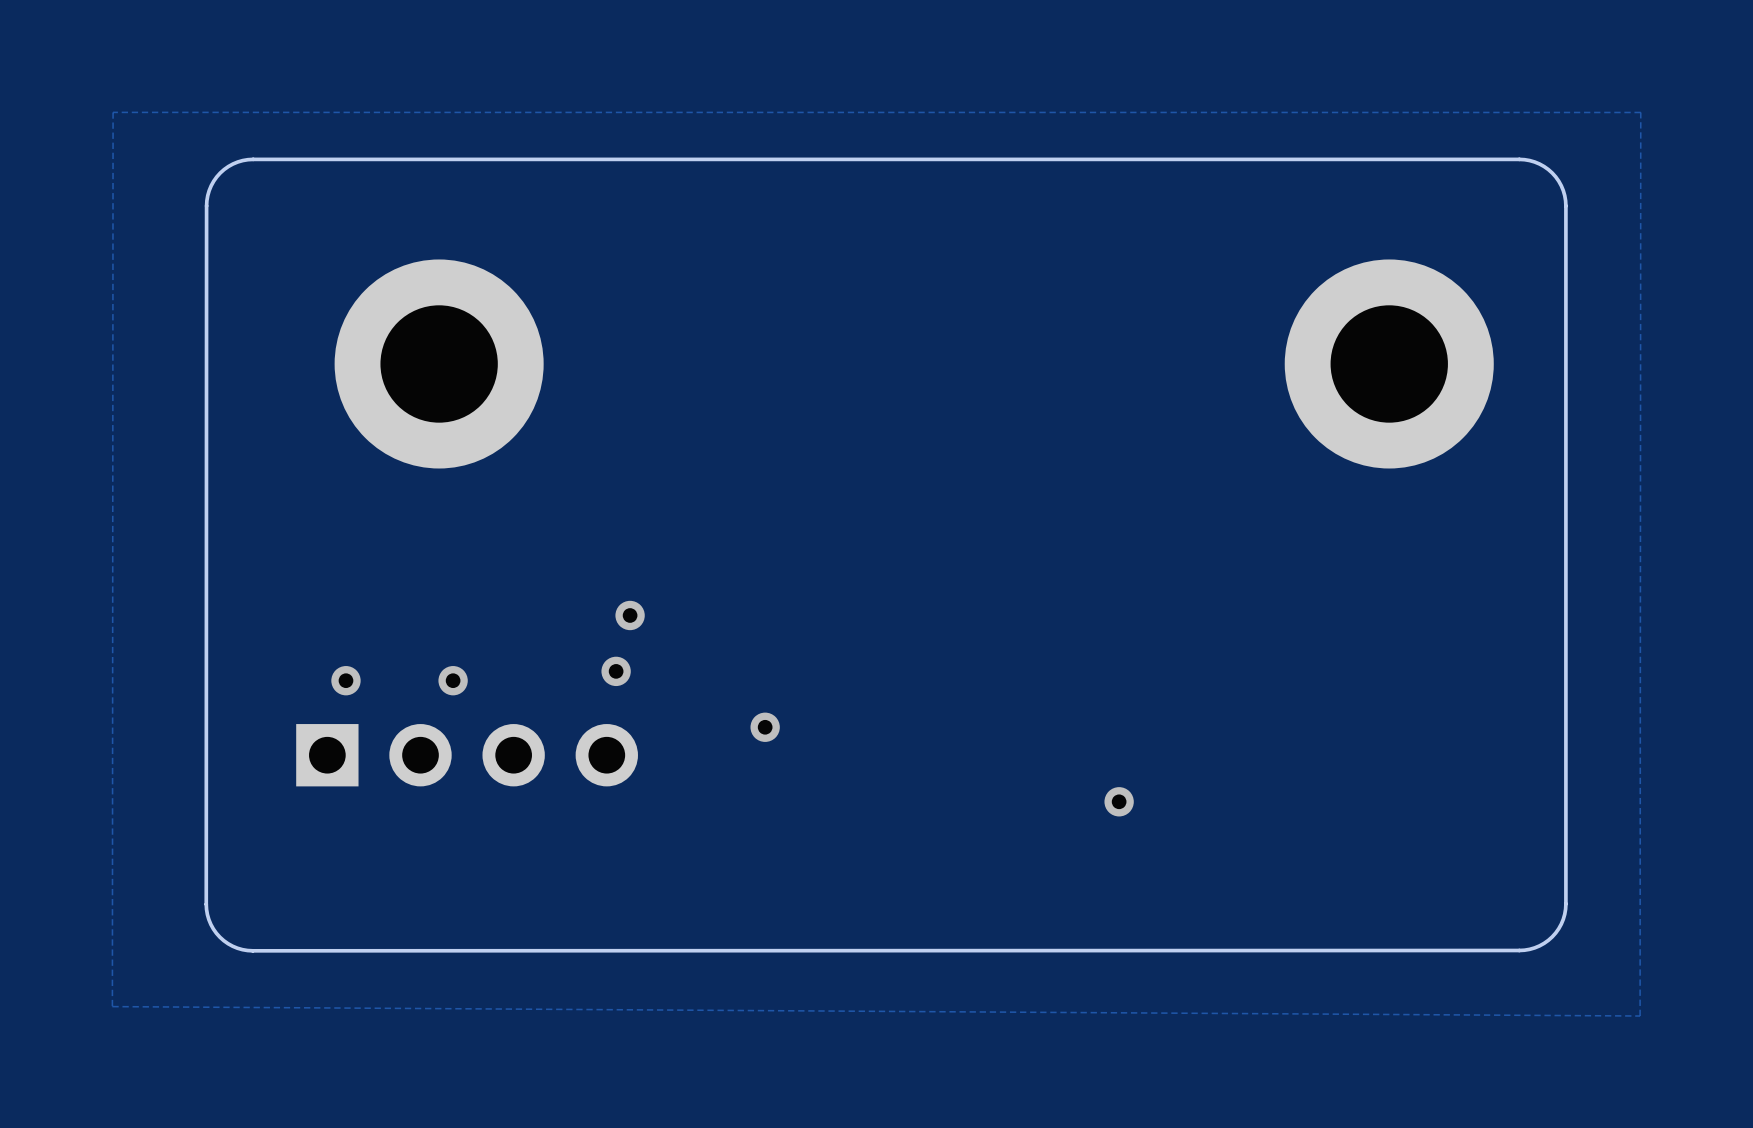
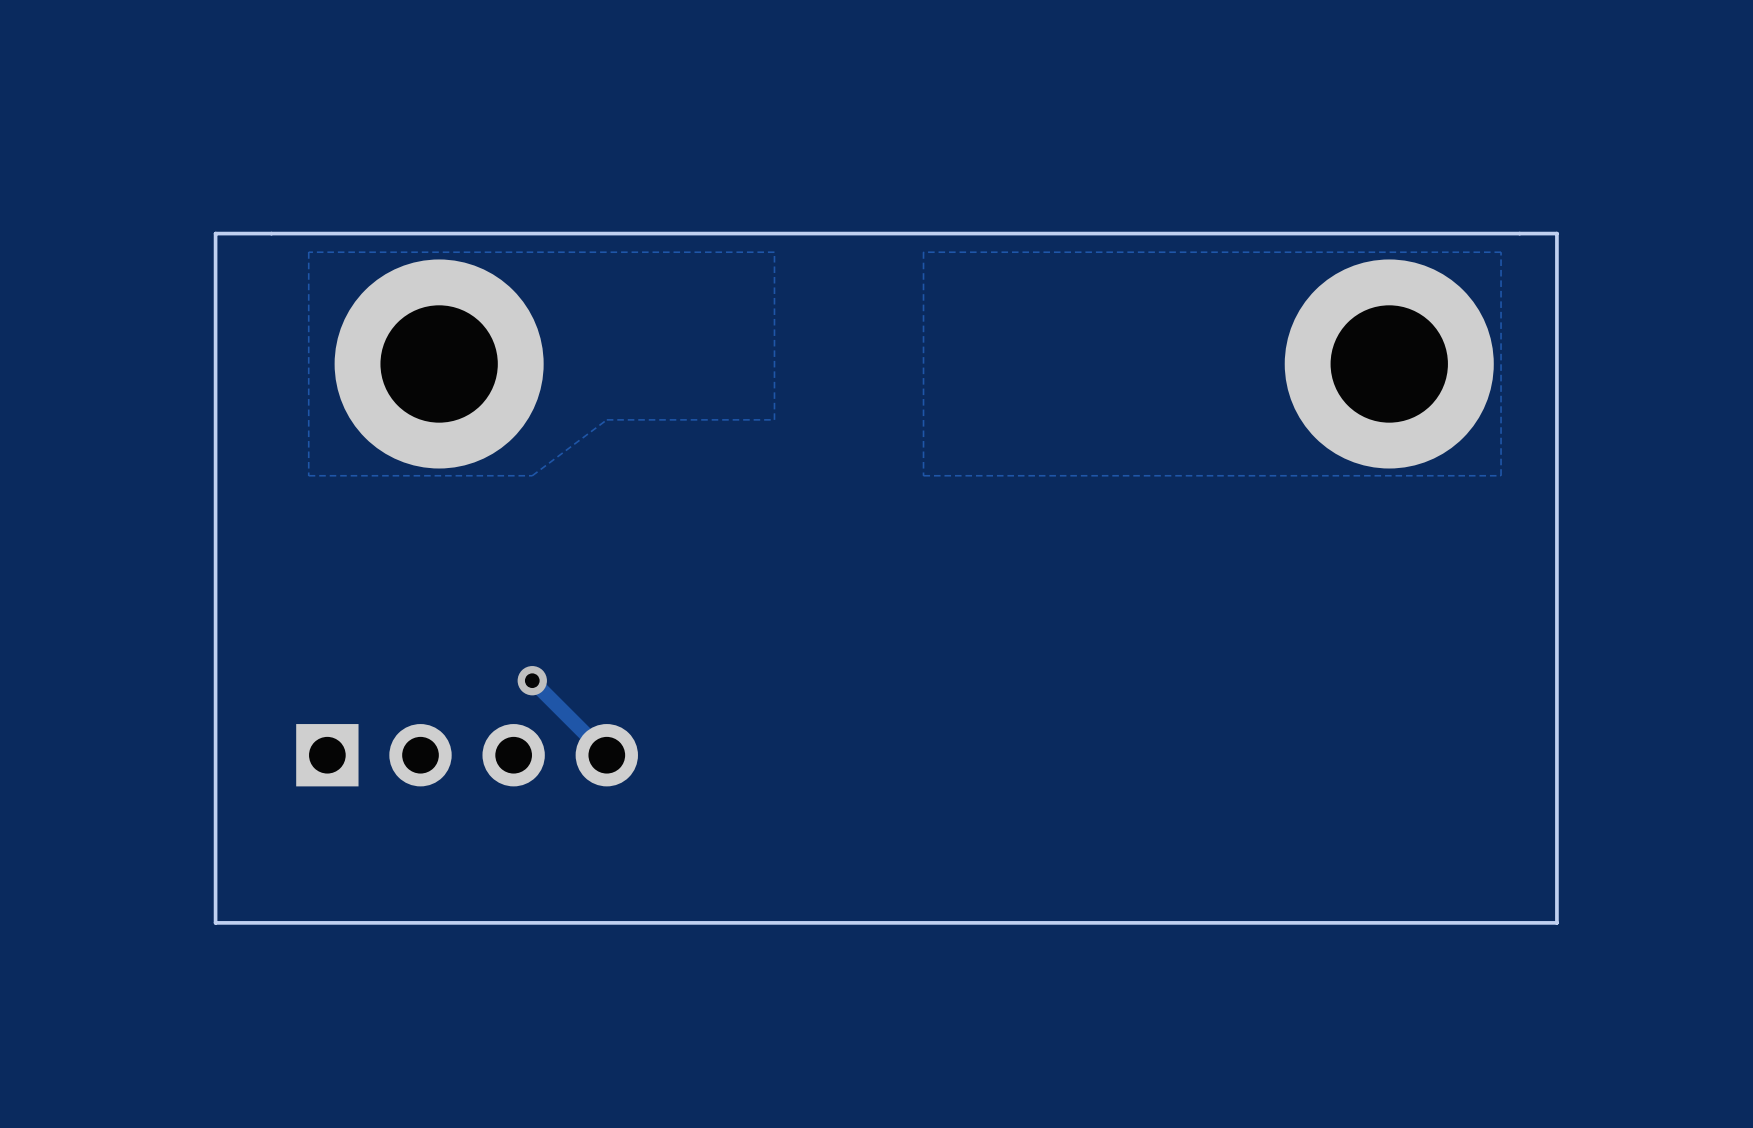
zone outline: (1640, 112) (1640, 1016) (112, 1006) (113, 112) (1640, 112) -> none
board edge: (1519, 159) (253, 159) (242, 160) (228, 166) (213, 181) (209, 190) (206, 205) (206, 904) (207, 914) (213, 929) (228, 943) (237, 948) (252, 950) (1519, 950) (1534, 947) (1544, 943) (1555, 932) (1561, 924) (1565, 903) (1565, 205) (1563, 190) (1552, 173) (1539, 164) (1519, 159) -> (1556, 233) (1556, 922) (215, 922) (215, 233) (1556, 233)
zone outline: none -> (774, 252) (774, 419) (606, 419) (532, 475) (308, 475) (308, 252) (774, 252)
zone outline: none -> (1501, 252) (923, 252) (923, 475) (1501, 475) (1501, 252)
via: (630, 615) -> none
via: (616, 671) -> none
via: (345, 680) -> none
via: (453, 680) -> none
track: none -> (532, 680) (606, 755)
via: none -> (532, 680)
via: (765, 727) -> none
via: (1119, 801) -> none

